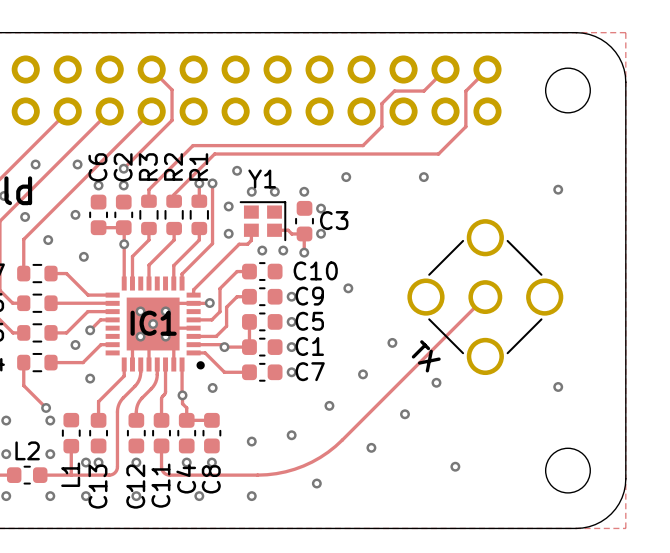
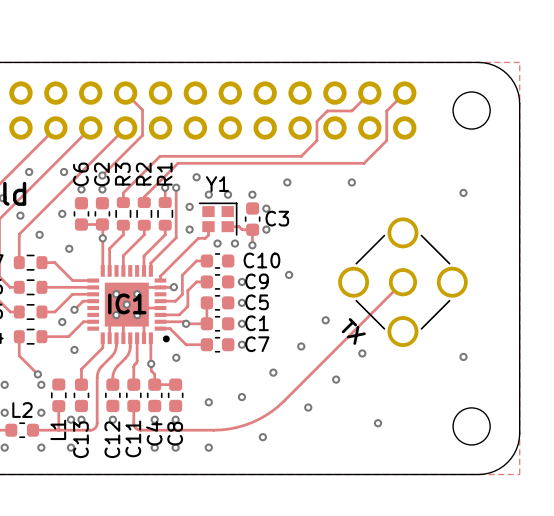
via: (136, 496) -> none
via: none -> (154, 447)
via: (199, 496) -> none
via: none -> (175, 447)

